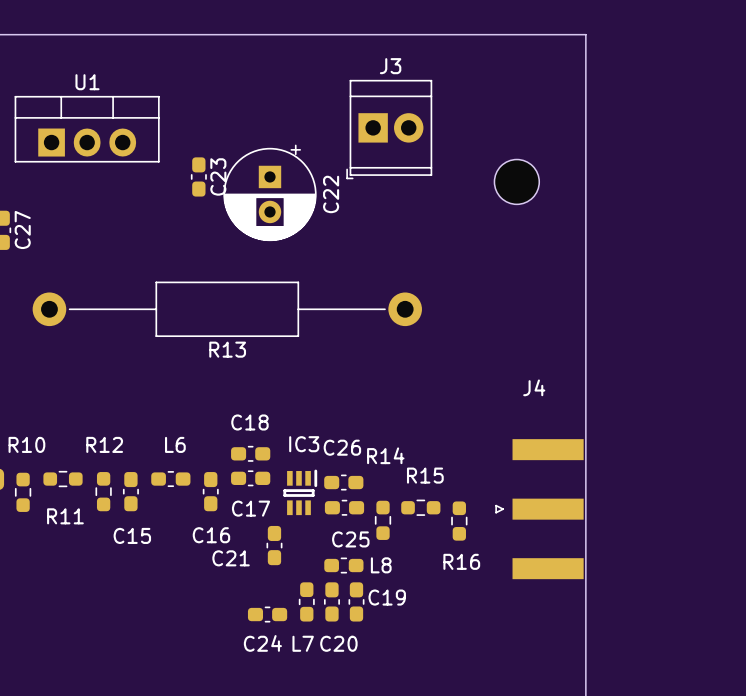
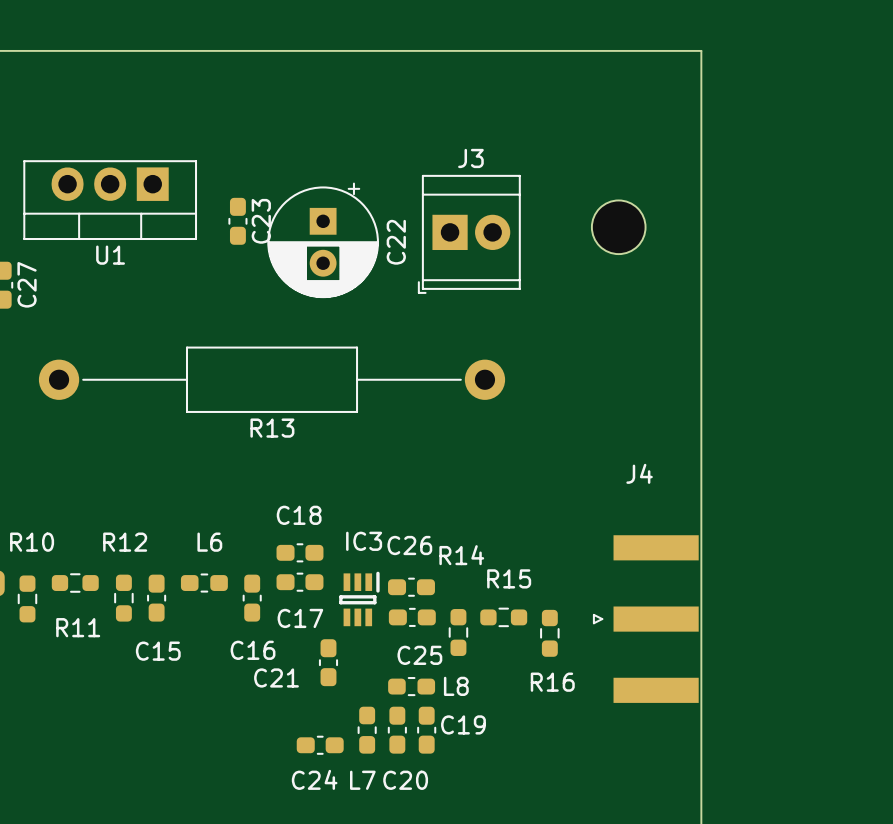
U1 rotation: 0° (87, 129) -> 180° (110, 200)
J3 position: (389, 129) -> (469, 234)

